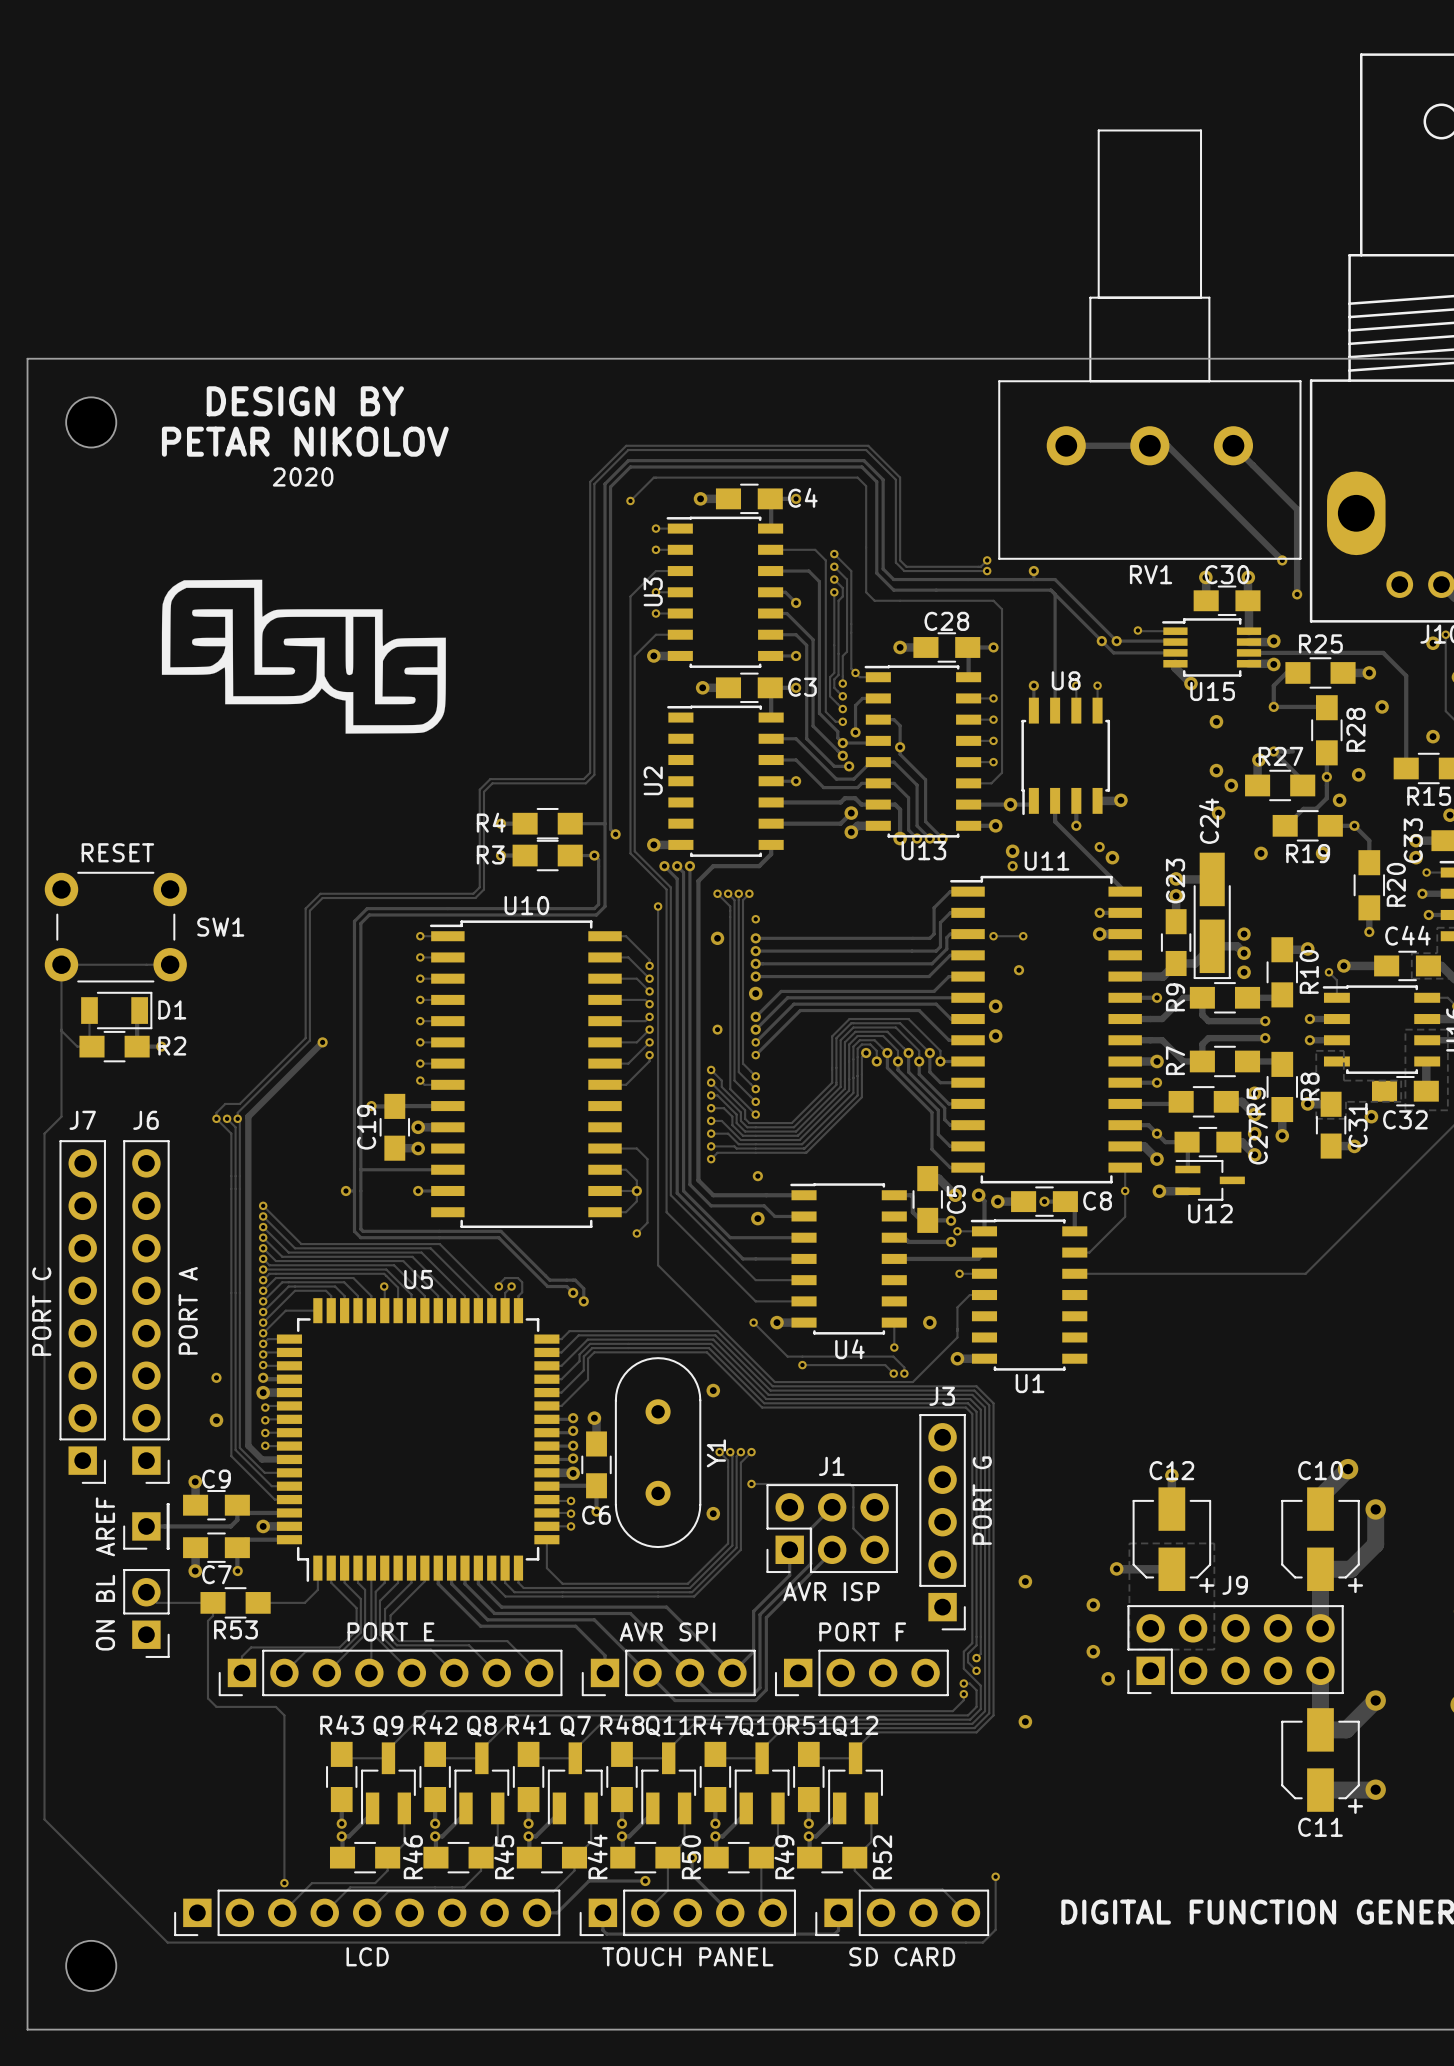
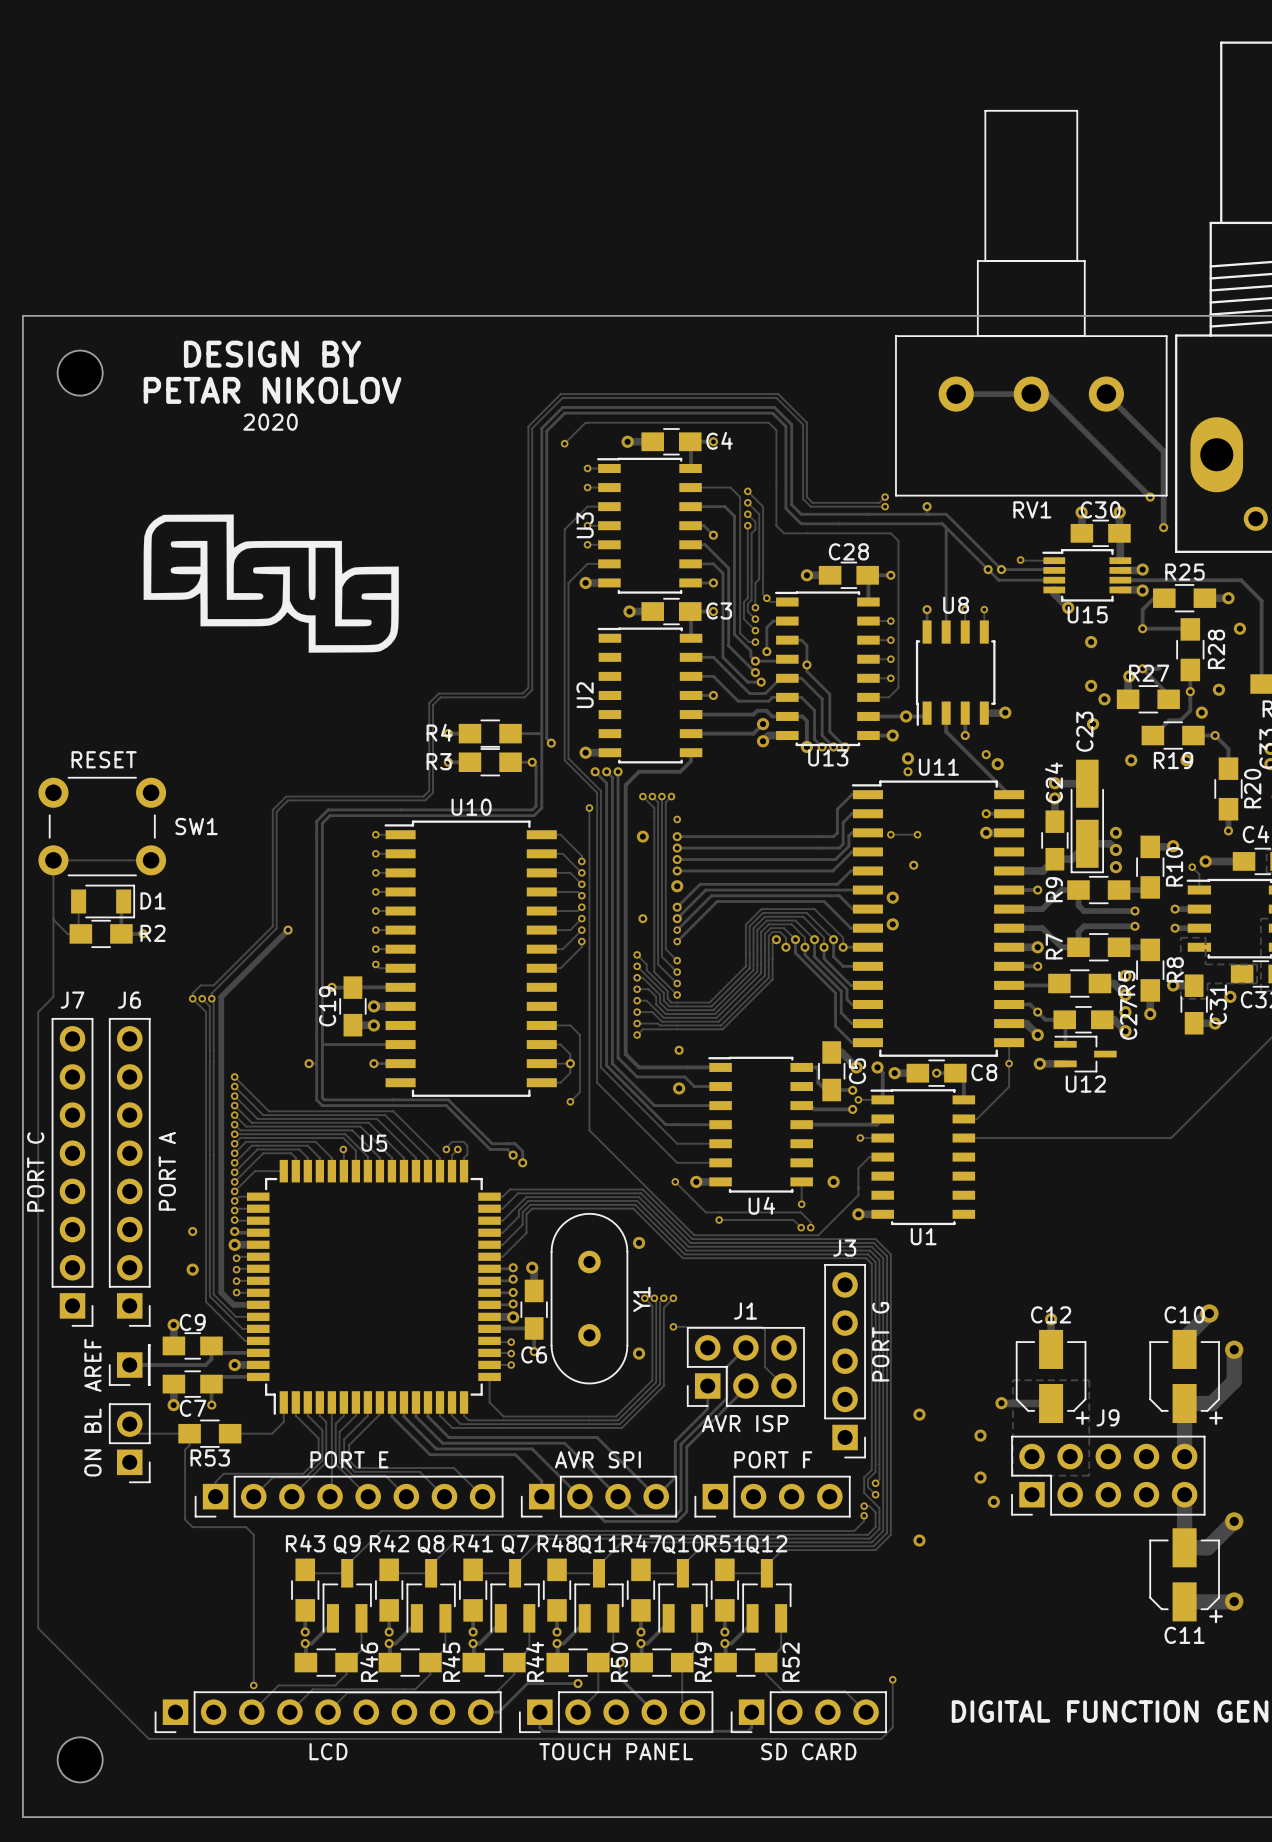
C24 name position: C24 (1209, 821) -> C24 (1053, 782)
C23 name position: C23 (1175, 881) -> C23 (1084, 731)

